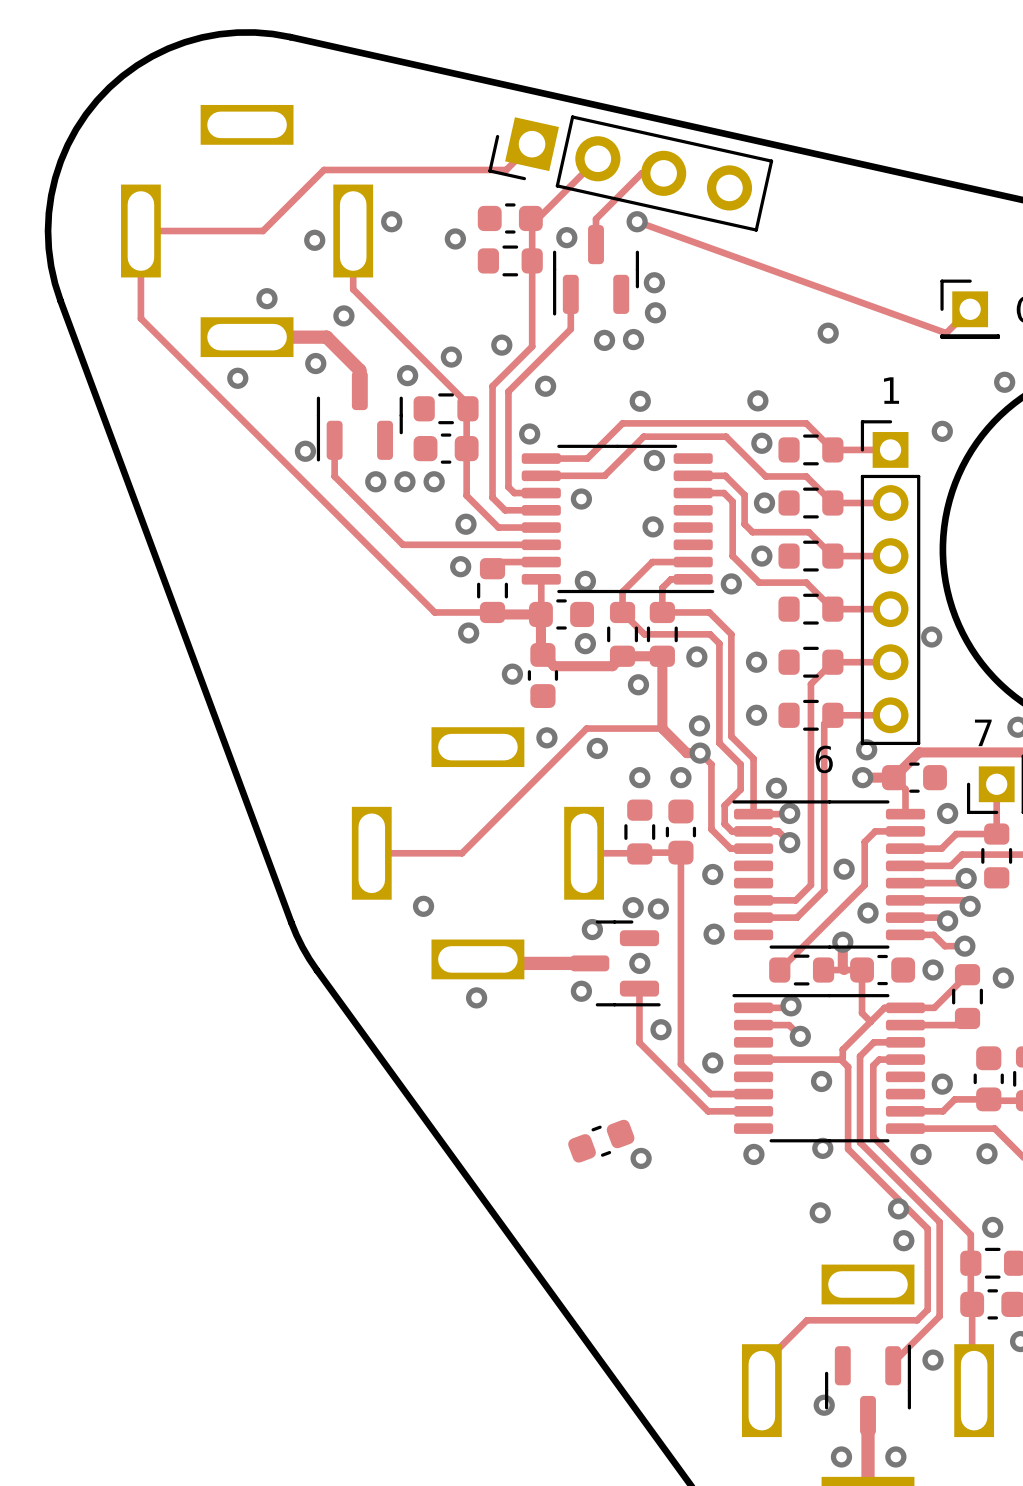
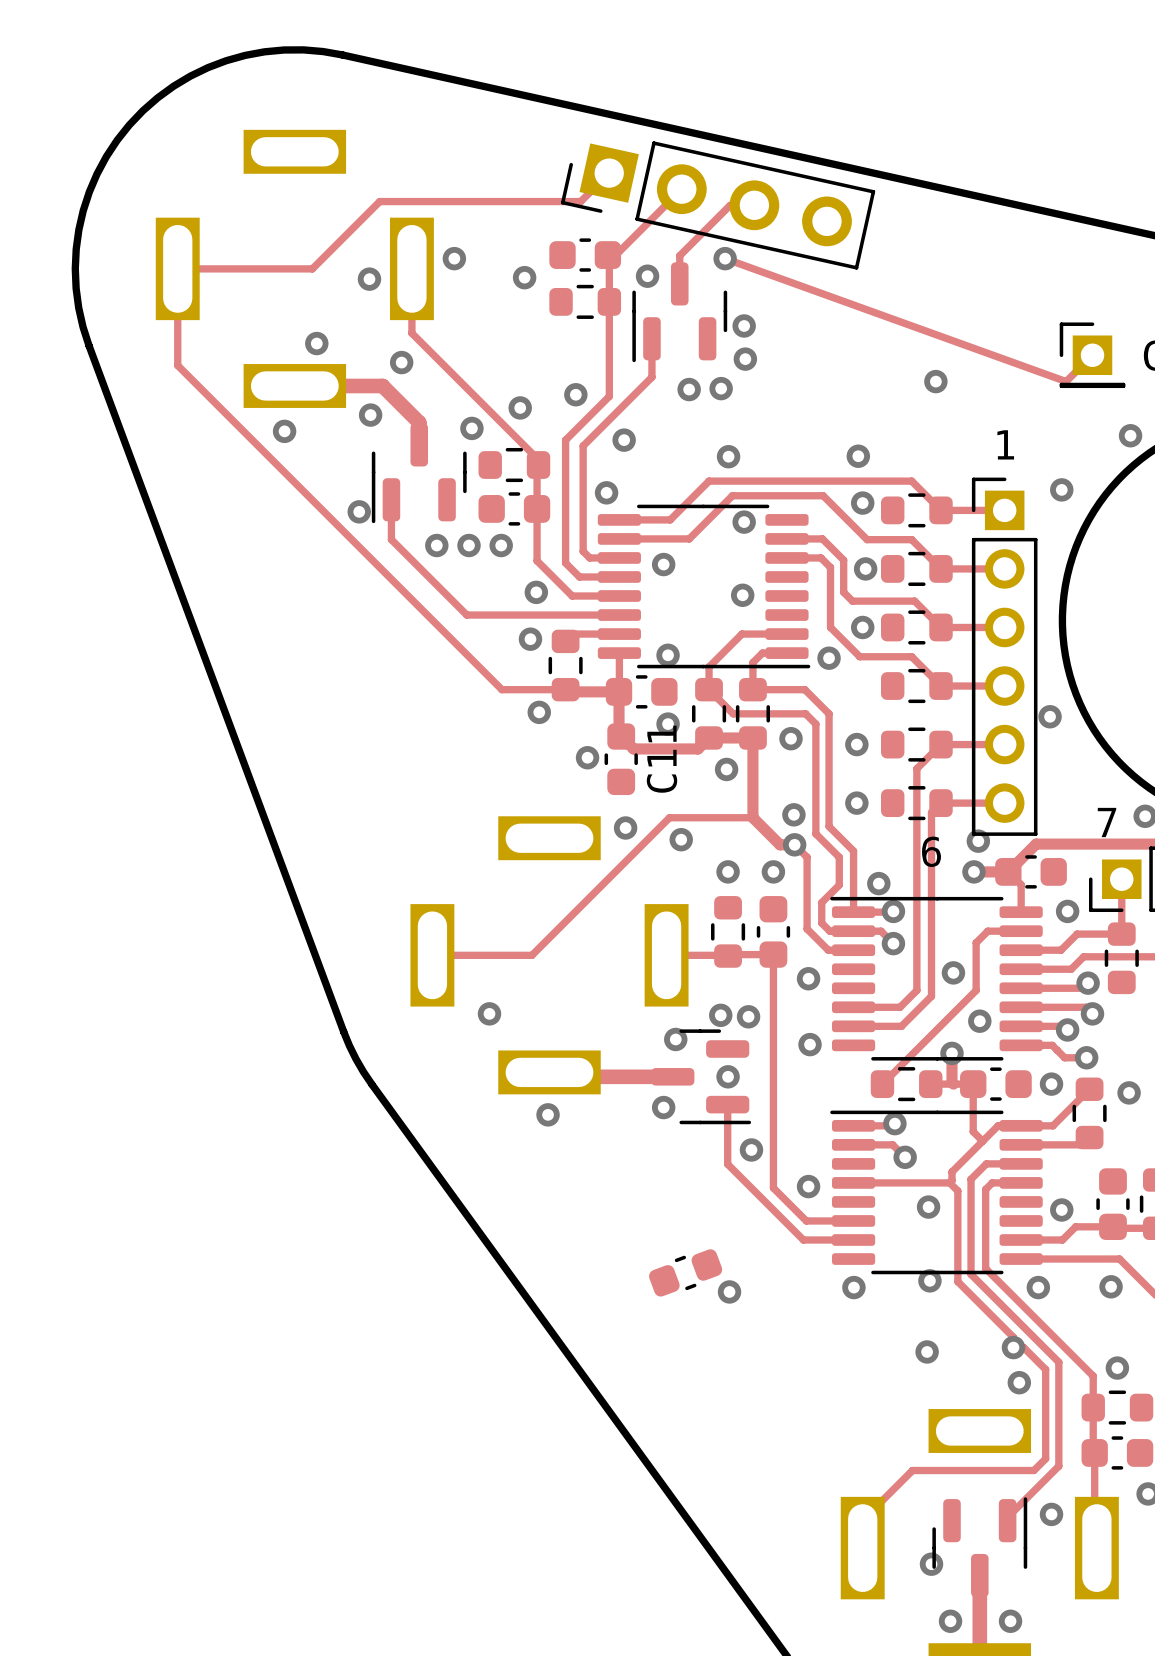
C11 name: none -> C11 (662, 759)

